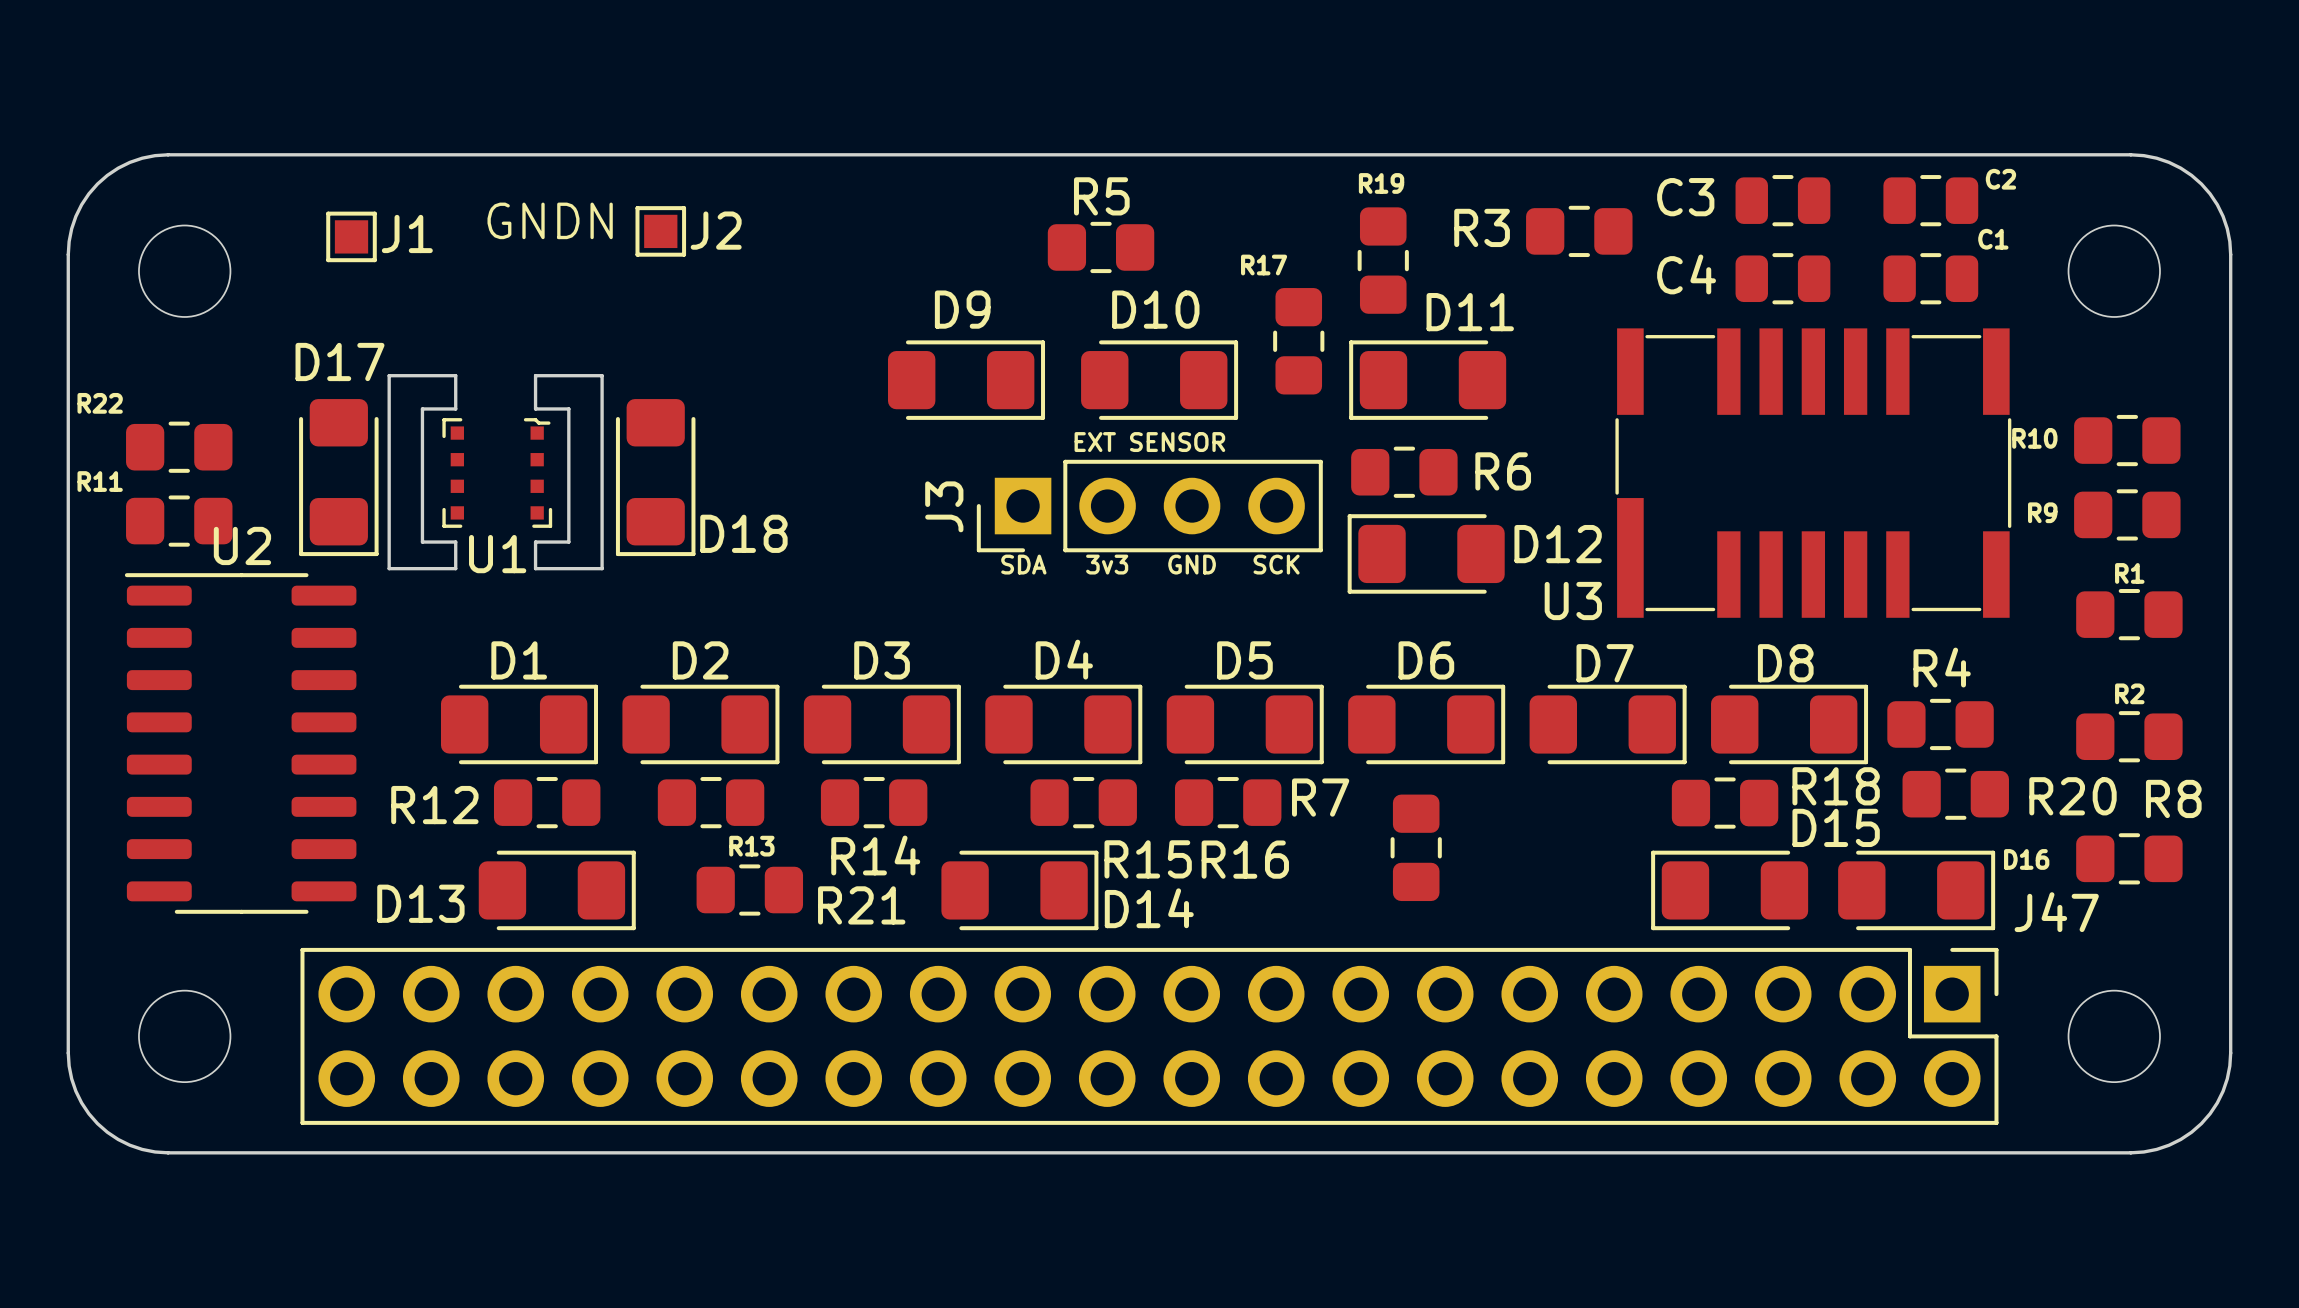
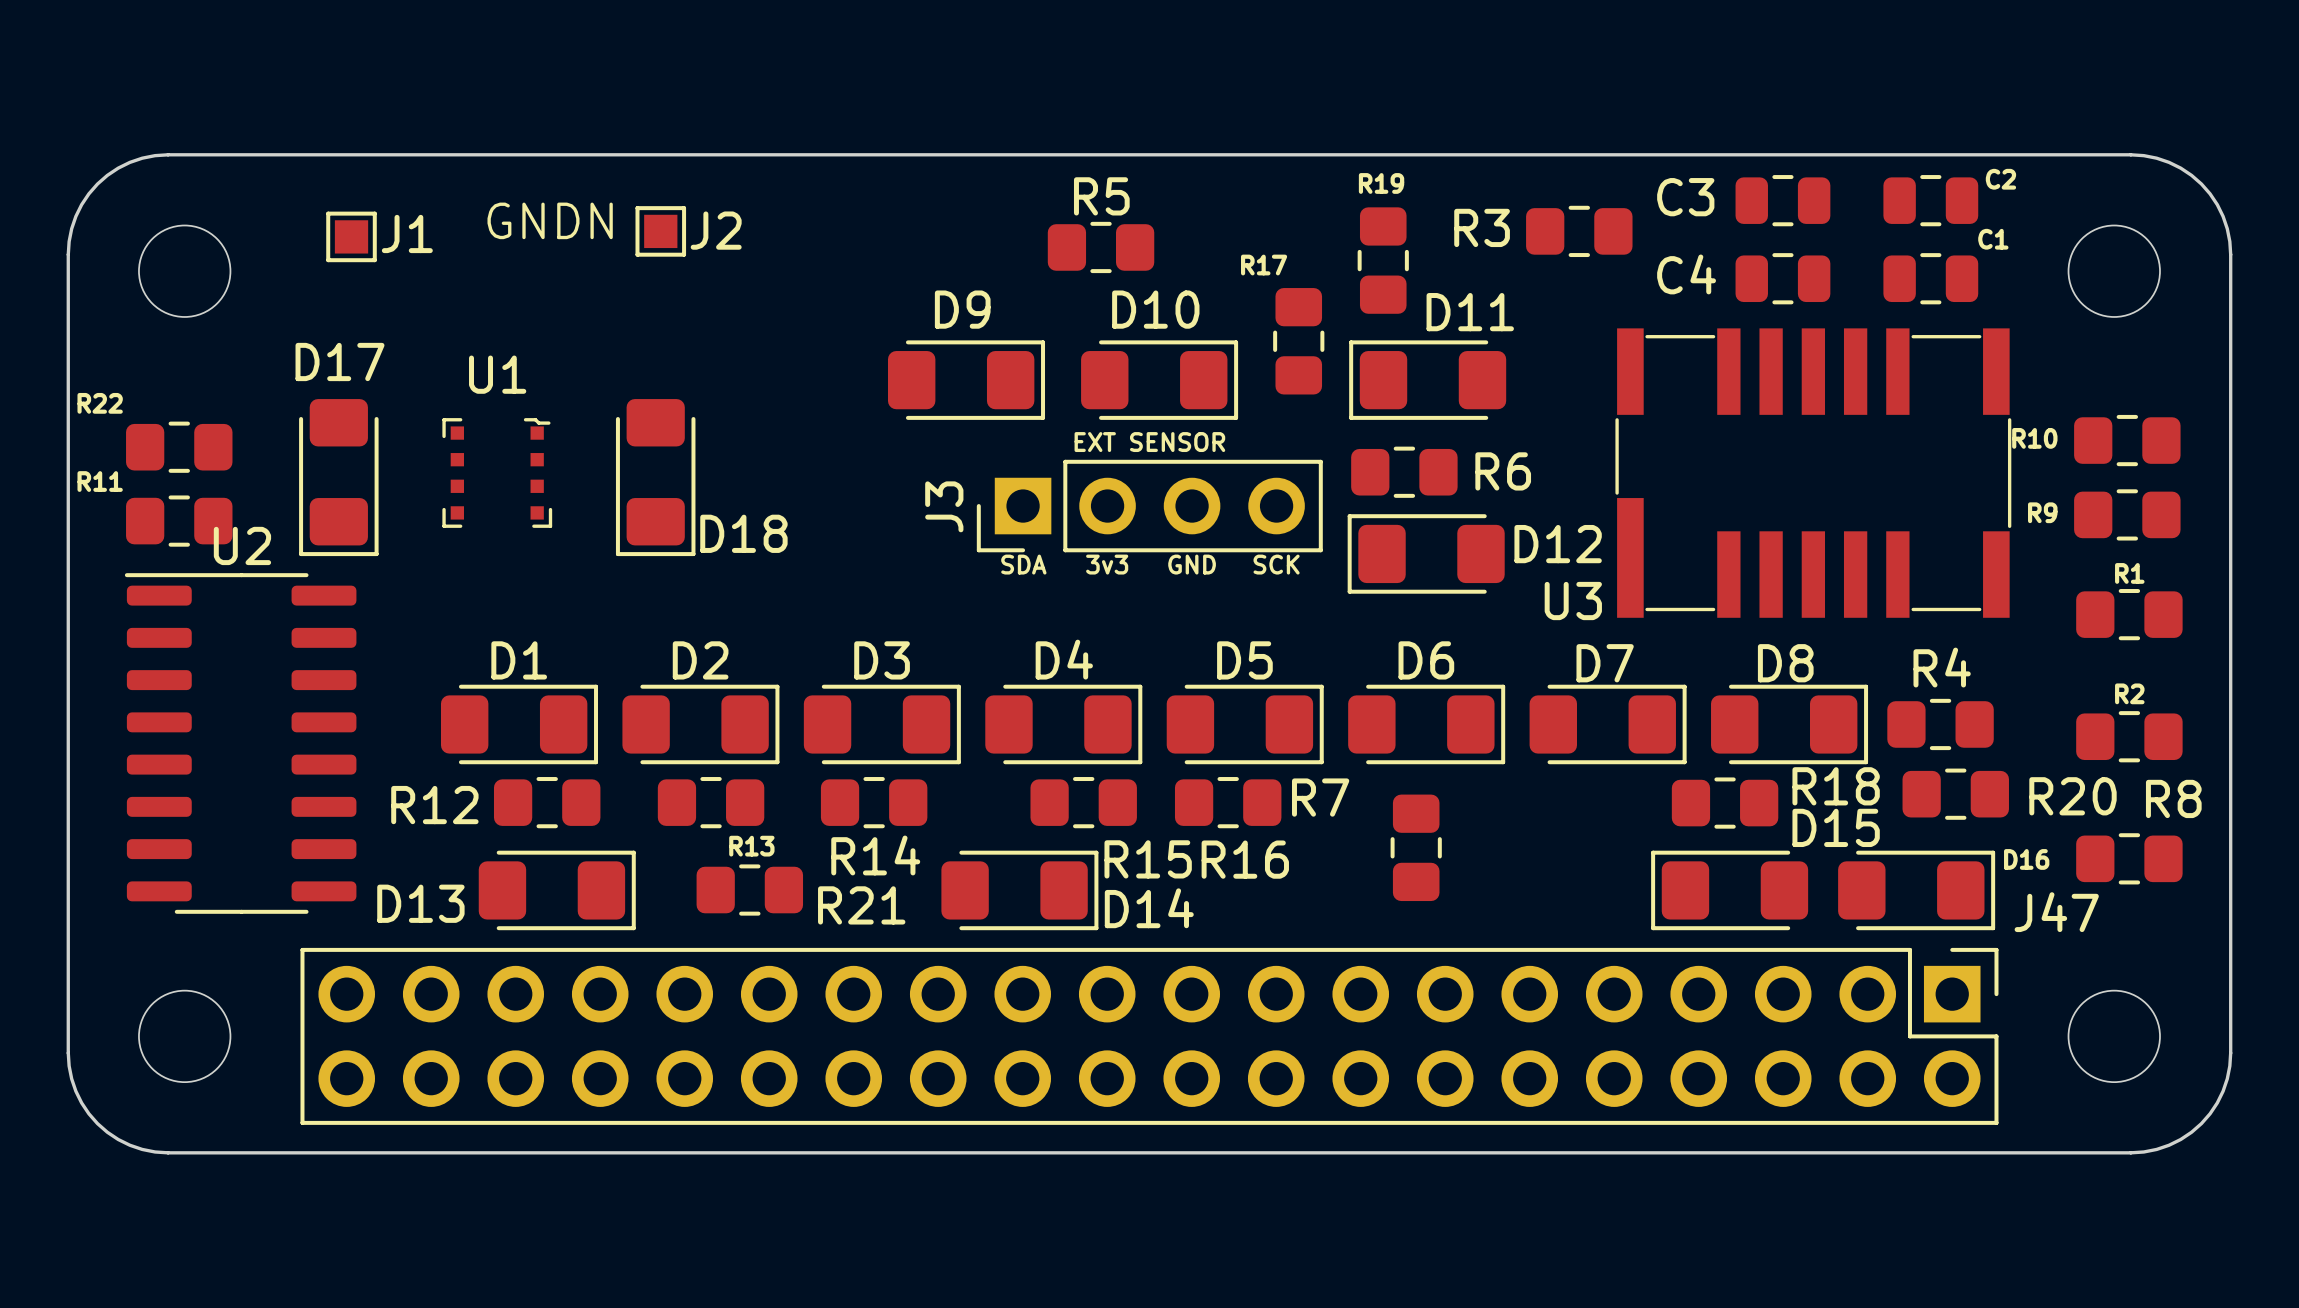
board edge: (389, 375) (455, 375) (455, 408) (422, 408) (422, 542) (455, 542) (455, 568) (389, 568) (389, 375) -> none
board edge: (535, 375) (602, 375) (602, 568) (535, 568) (535, 542) (568, 542) (568, 408) (535, 408) (535, 375) -> none
U1 name position: U1 (497, 554) -> U1 (497, 374)

